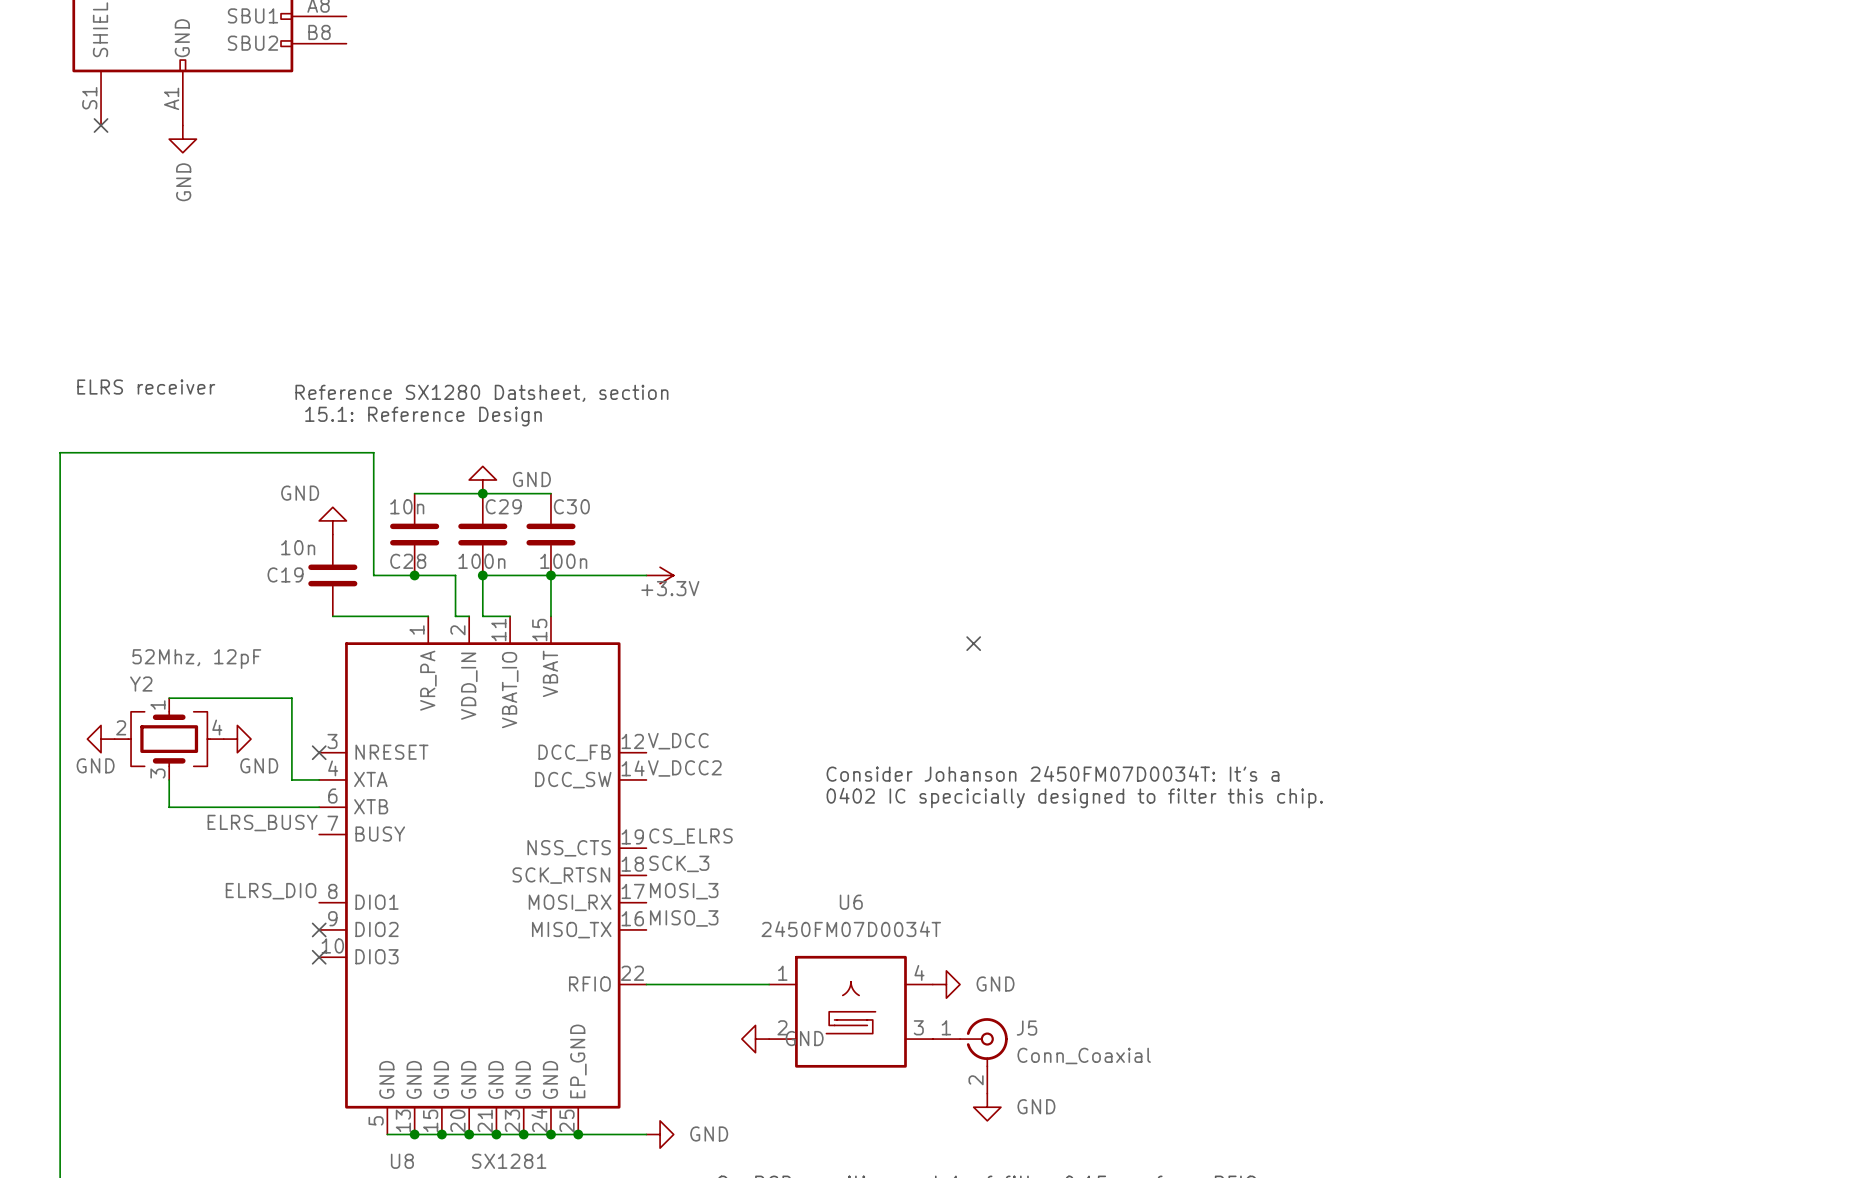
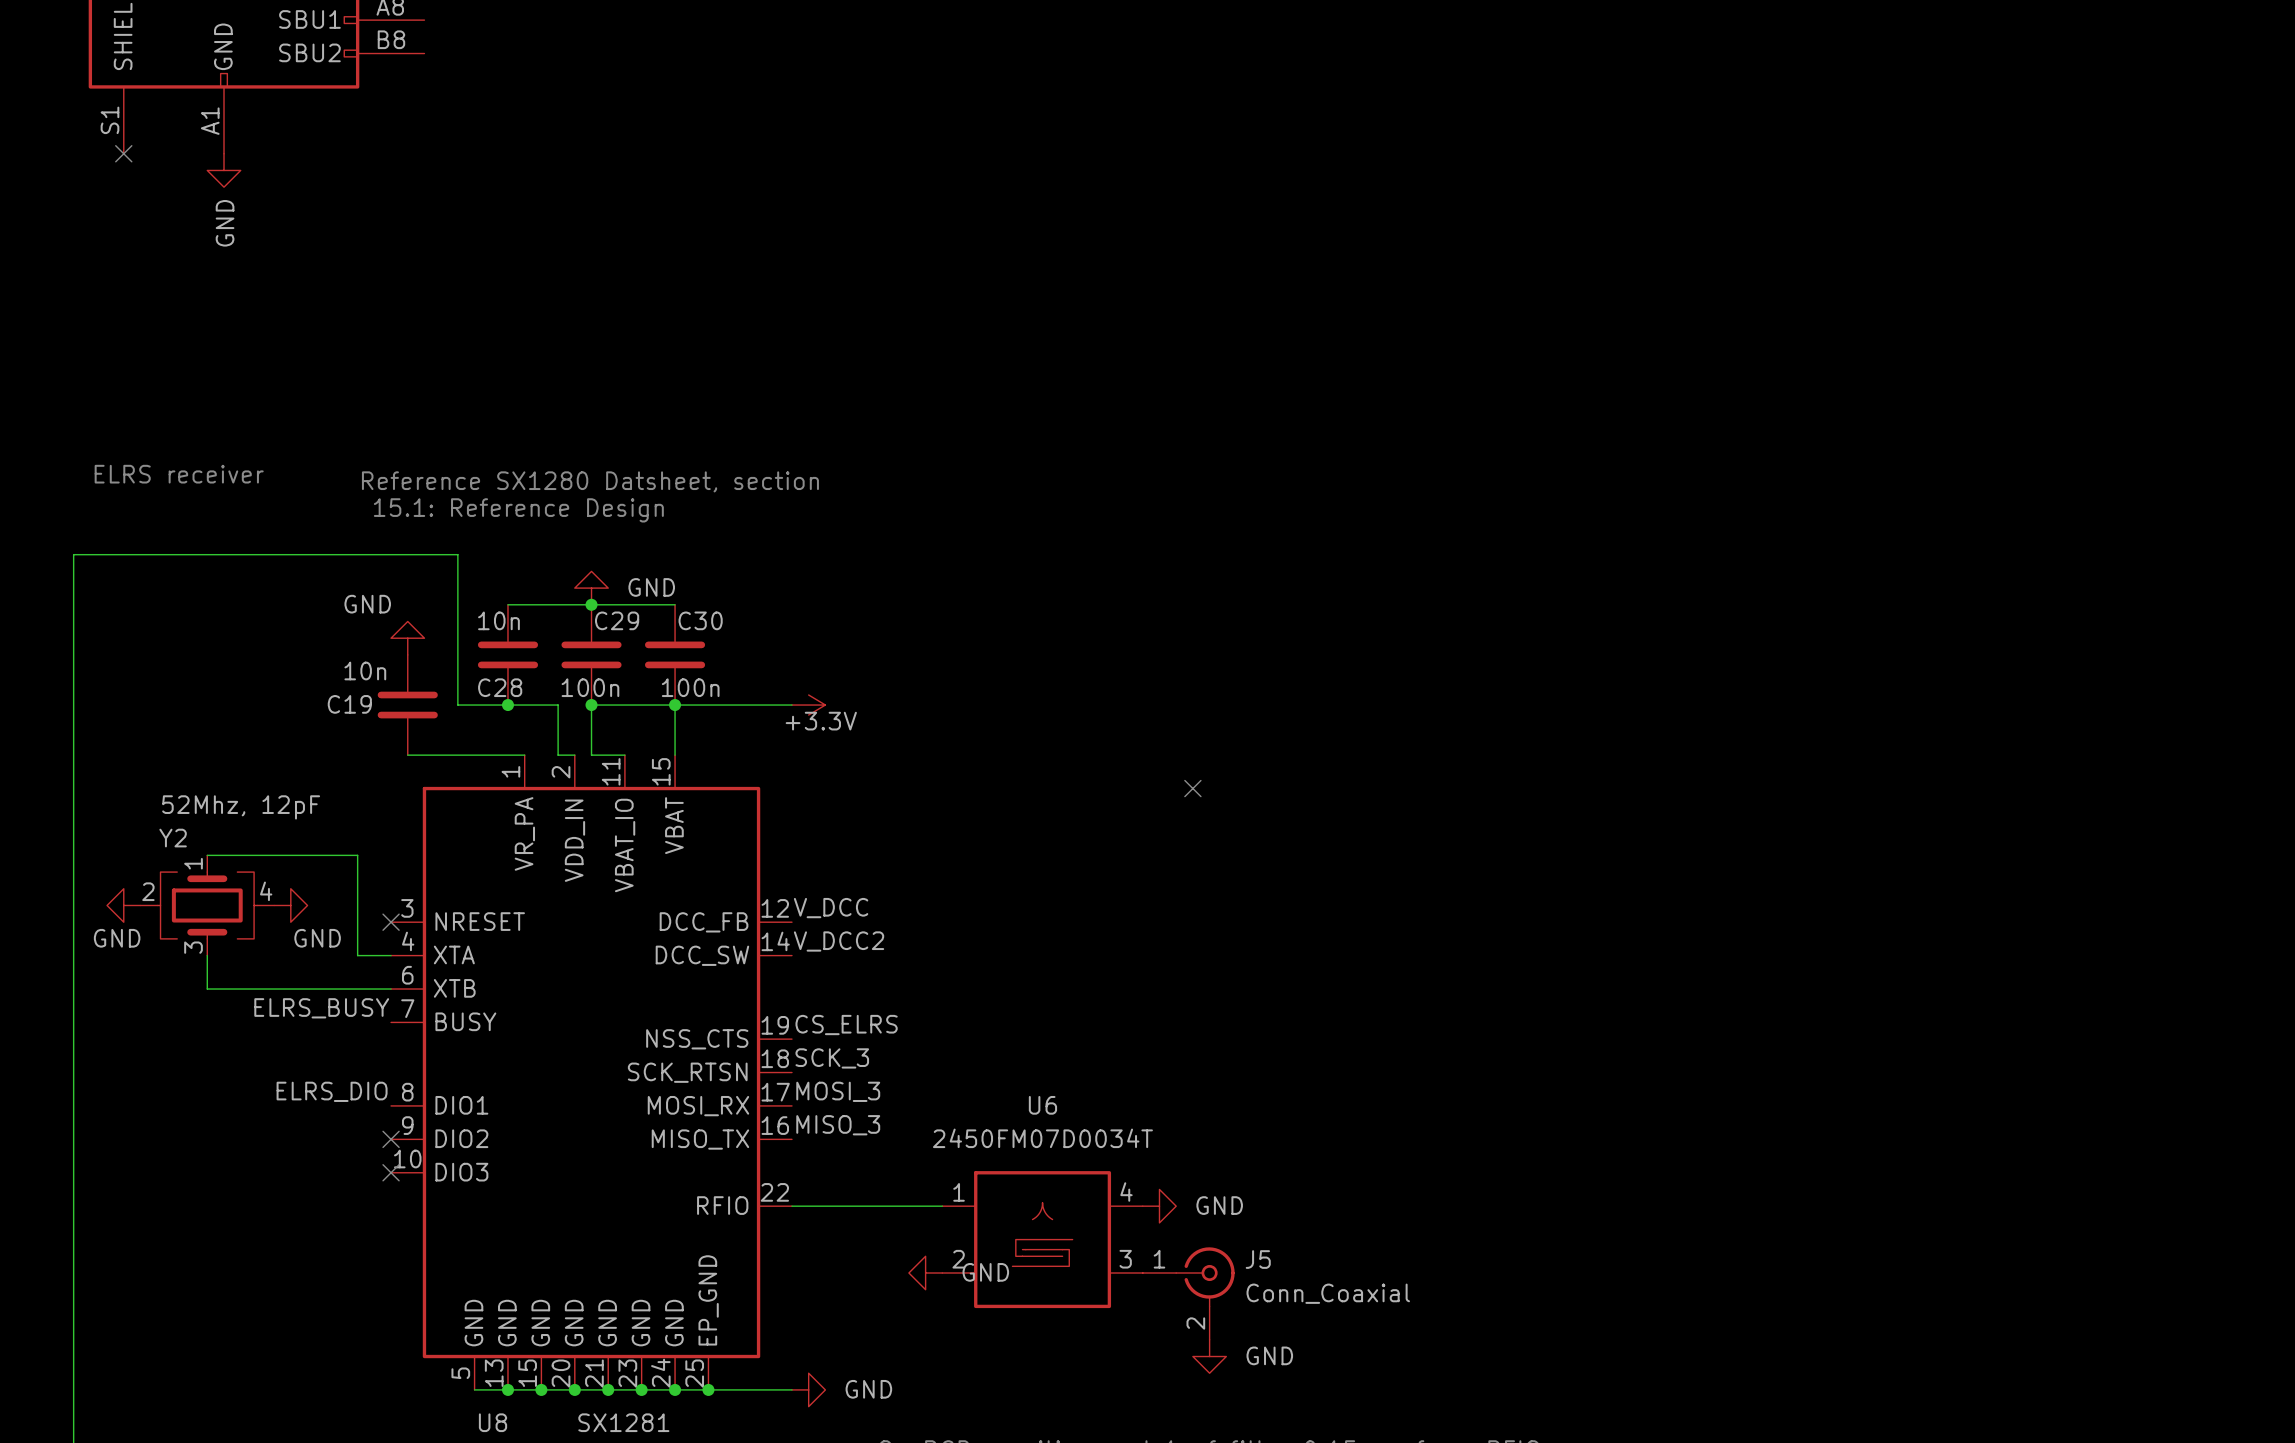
text: Consider Johanson 2450FM07D0034T: It's a (1052, 773) -> none
text: 0402 IC specicially designed to filter this chip. (1074, 798) -> none

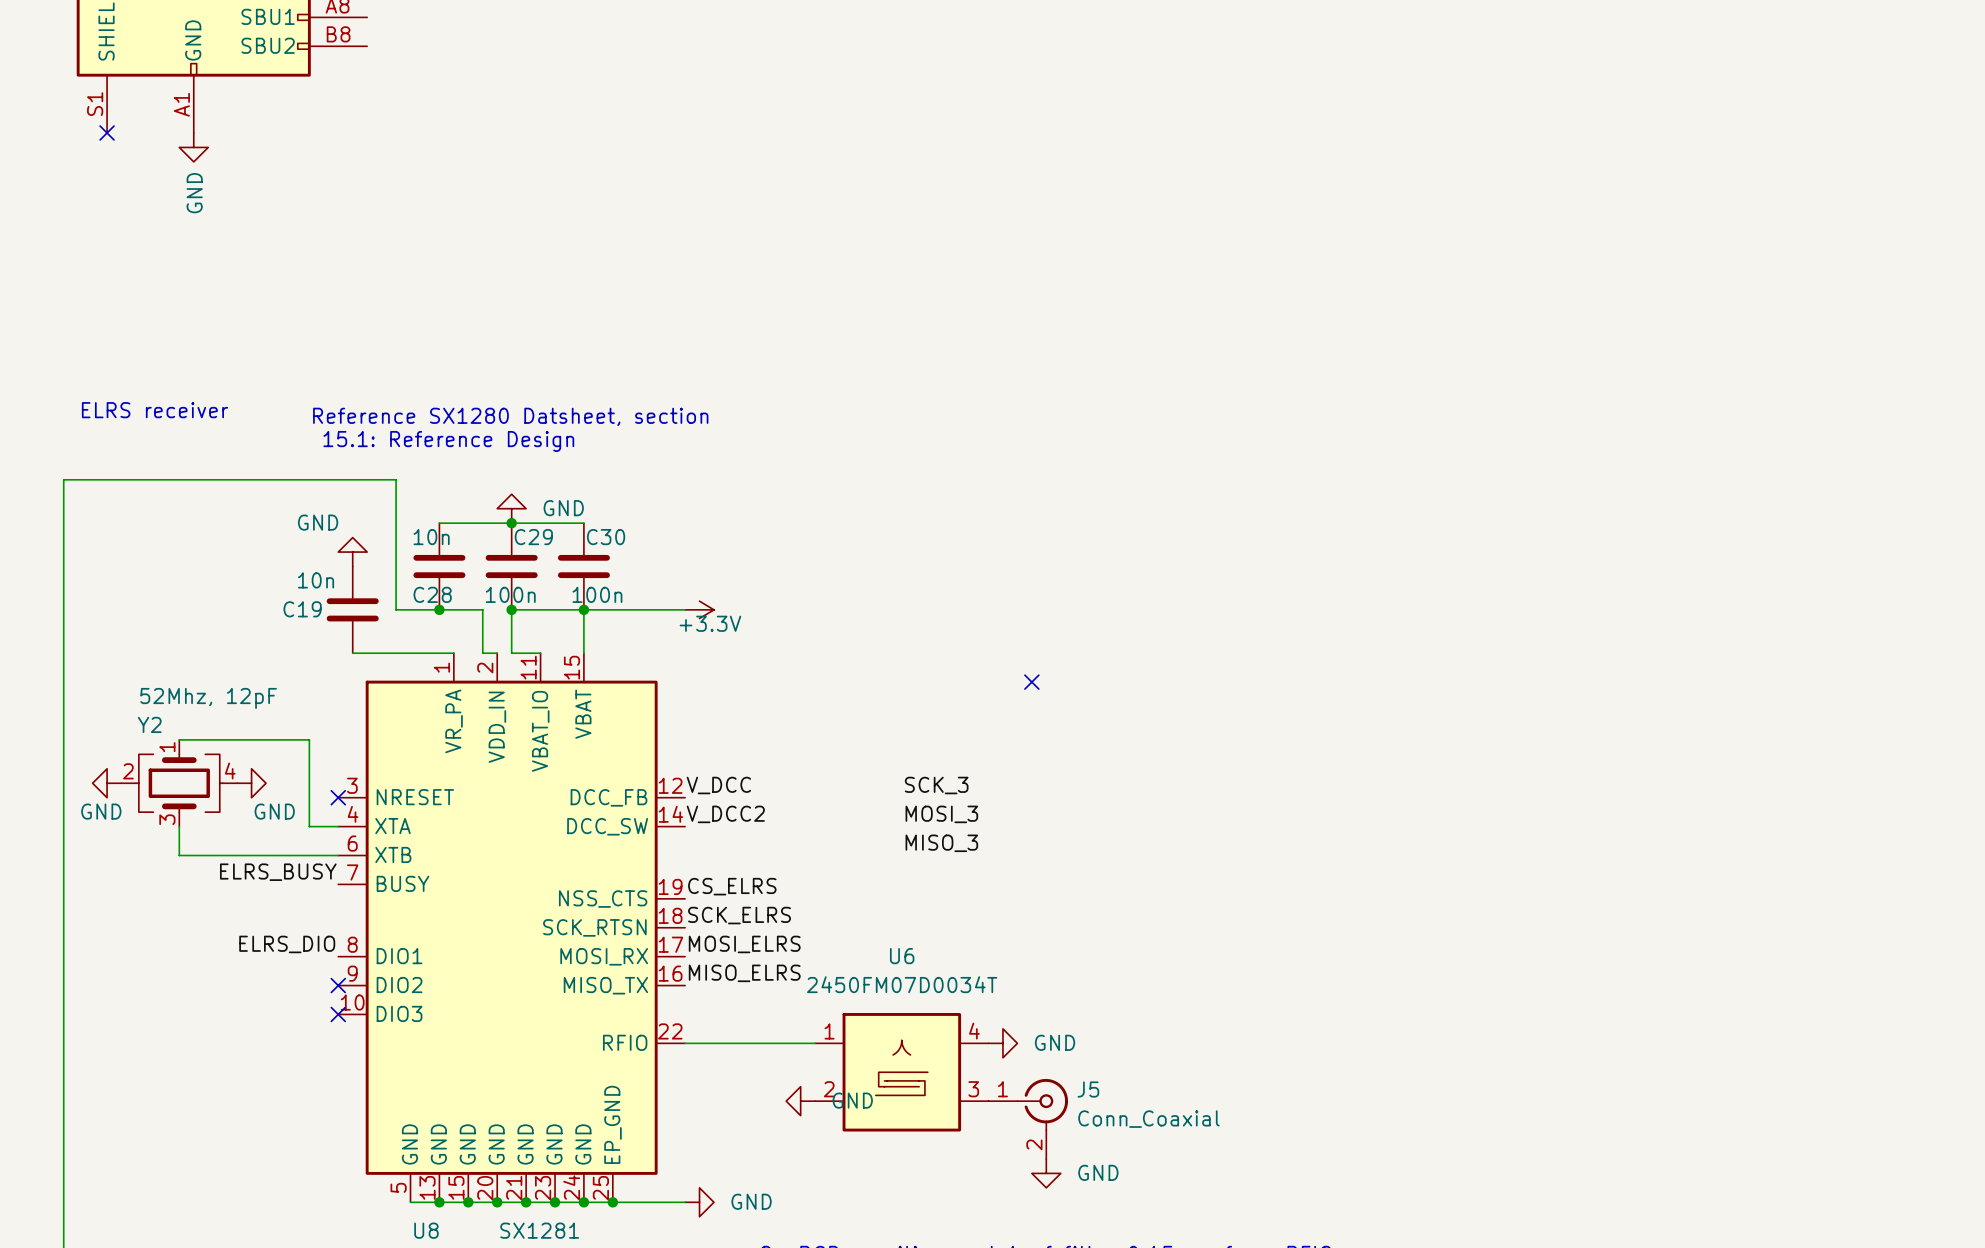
label: none -> SCK_3 (936, 785)
label: none -> MOSI_3 (941, 814)
label: none -> MISO_3 (941, 843)
label: SCK_3 (832, 1058) -> SCK_ELRS (739, 915)
label: MOSI_3 (838, 1091) -> MOSI_ELRS (744, 944)
label: MISO_3 (838, 1125) -> MISO_ELRS (744, 973)

